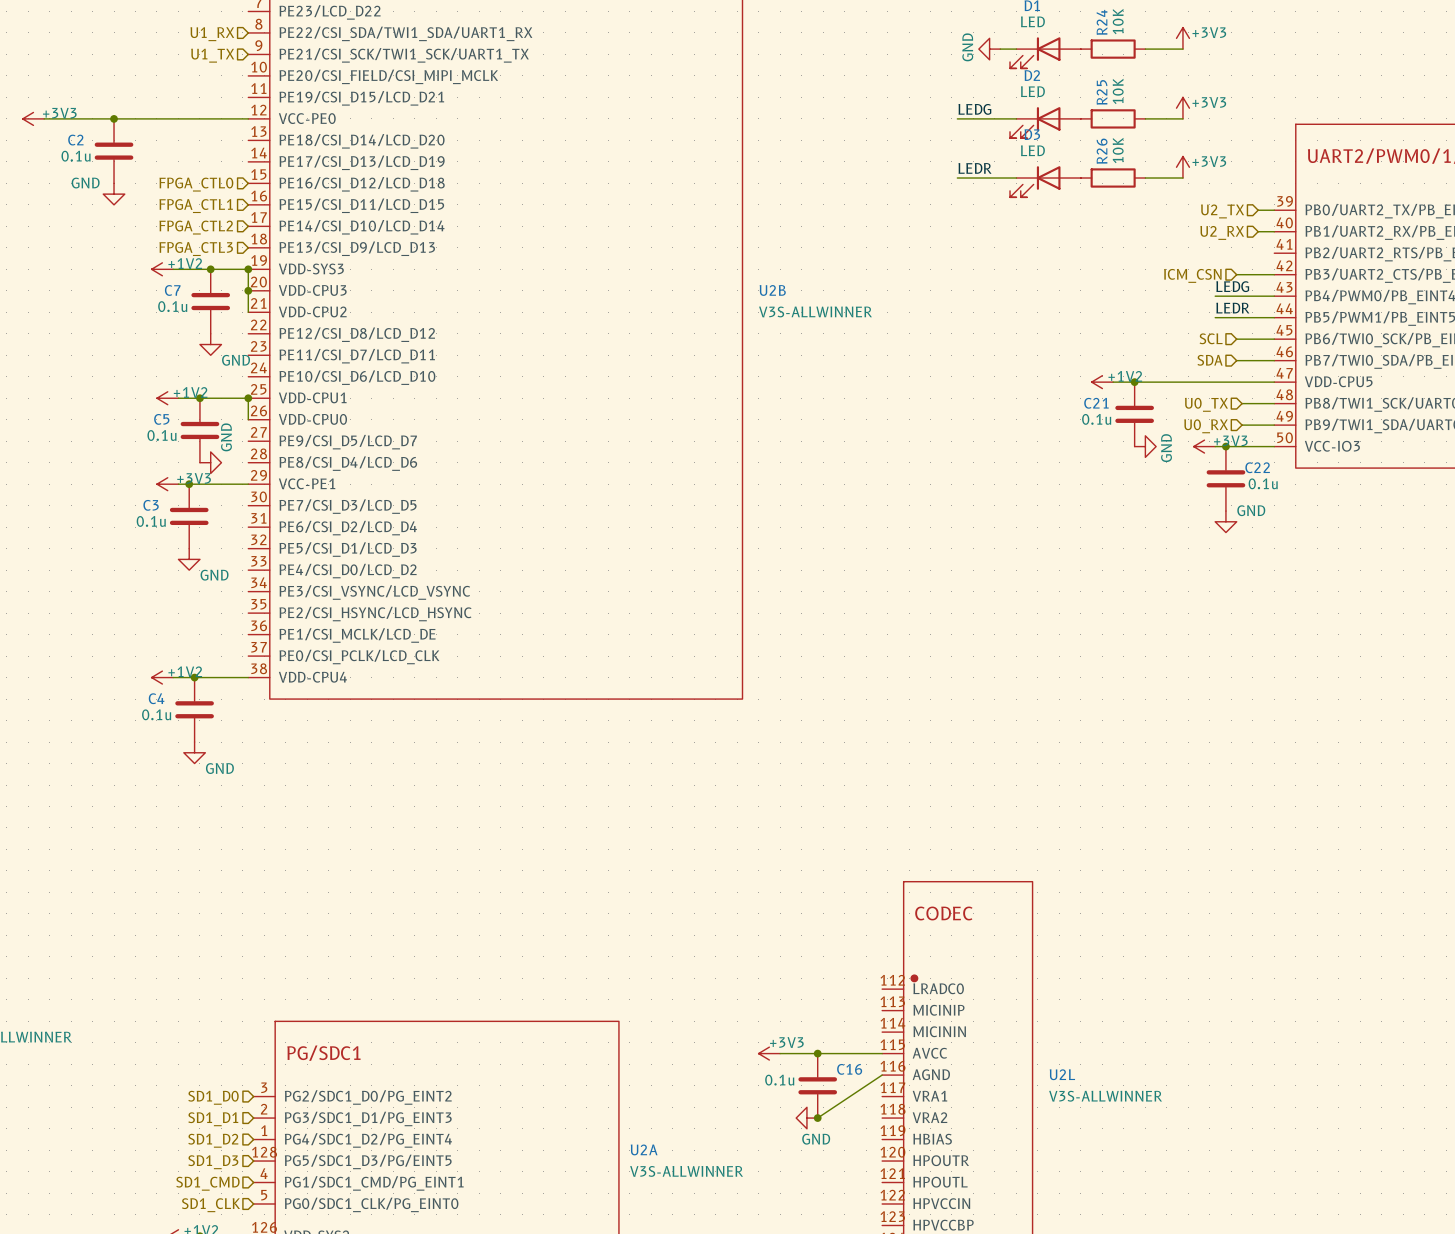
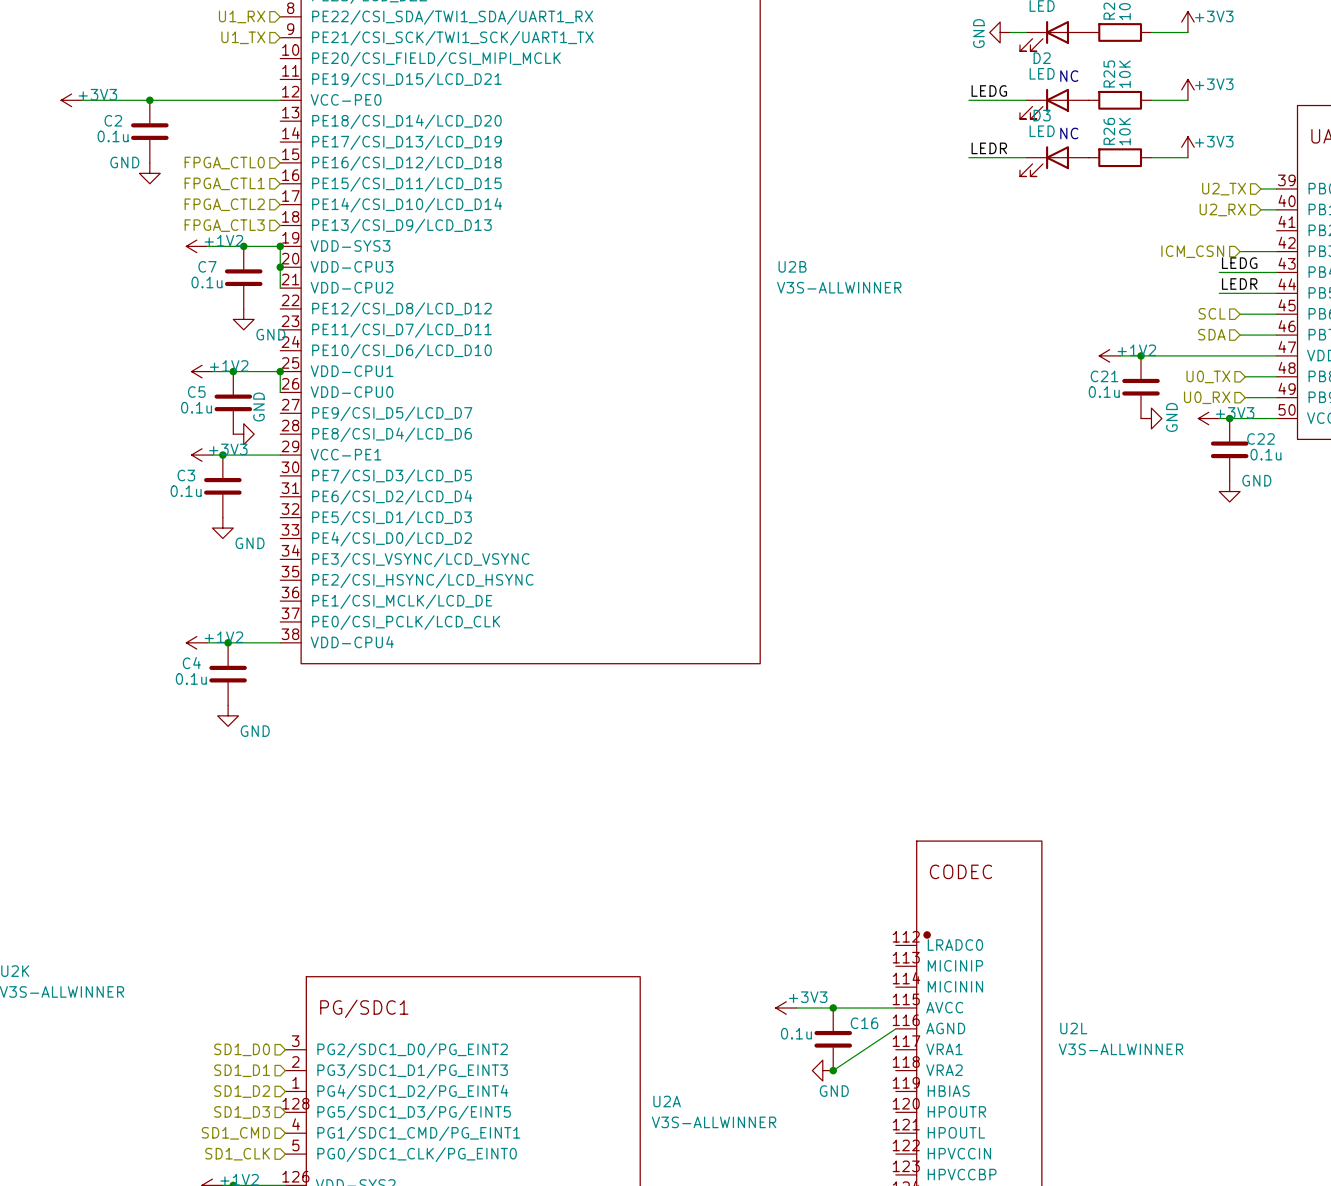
text: none -> NC (1069, 76)
text: none -> NC (1069, 133)

